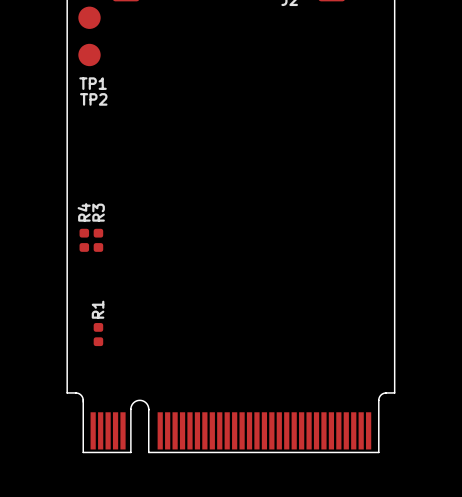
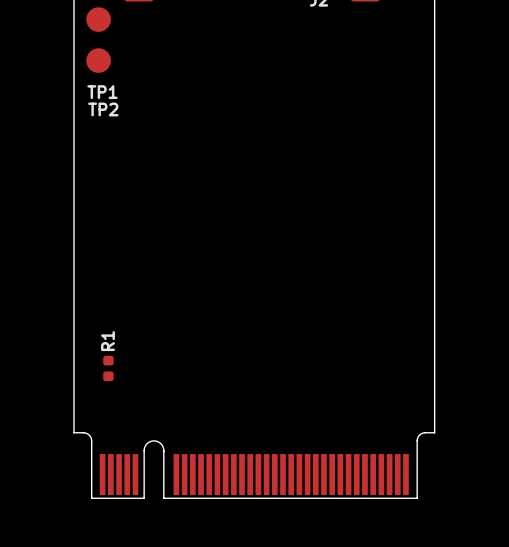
R4: (84, 240) -> none
R3: (98, 240) -> none

